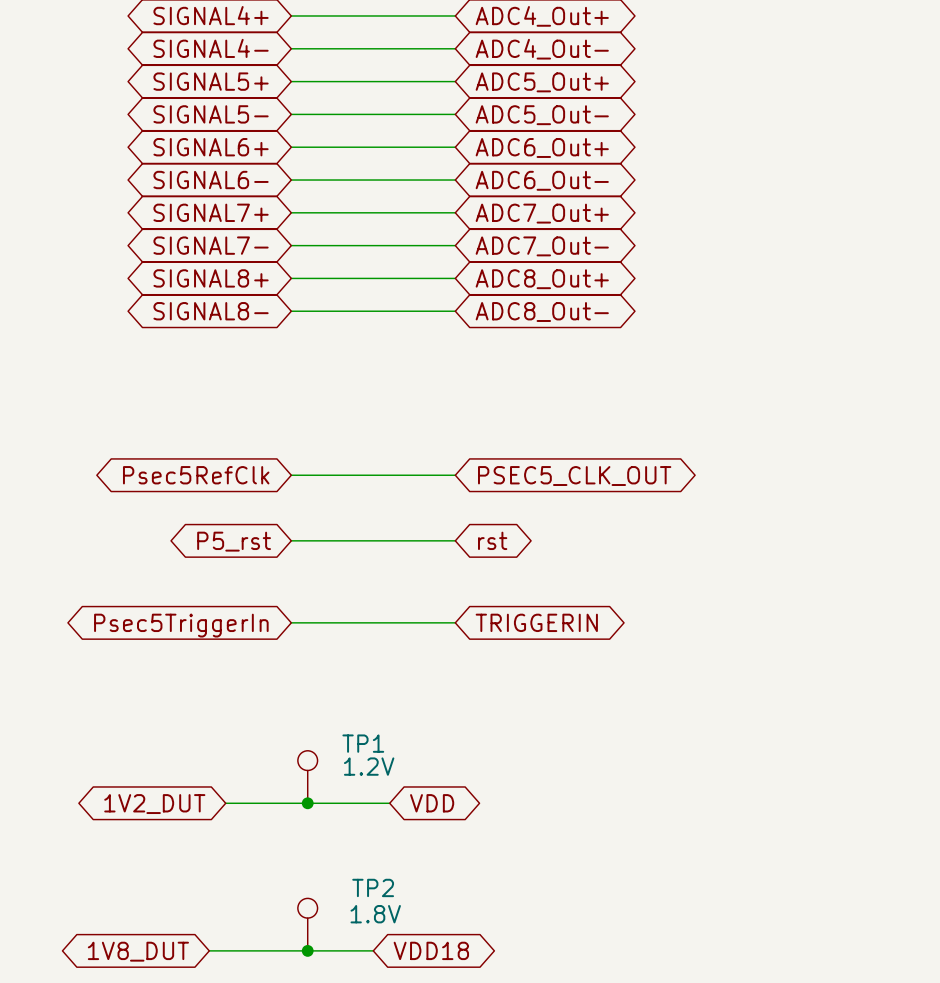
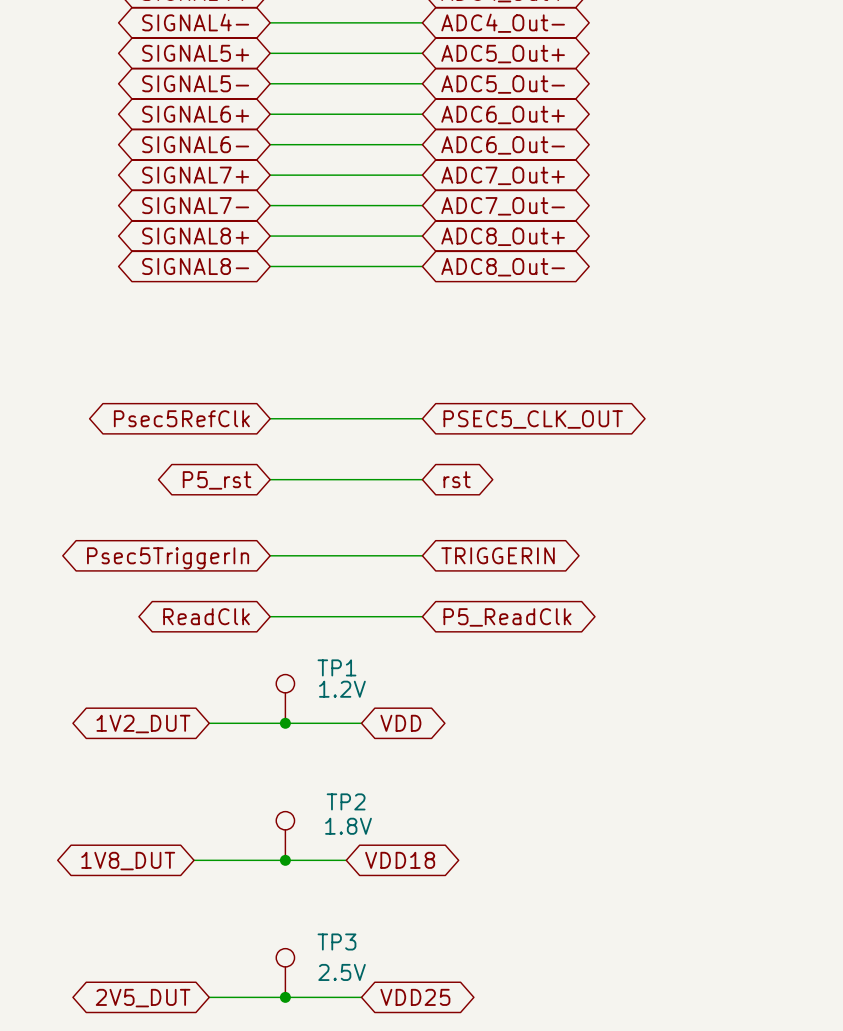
global label: none -> ReadClk (206, 616)
wire: none -> (270, 616) (422, 616)
global label: none -> P5_ReadClk (507, 617)

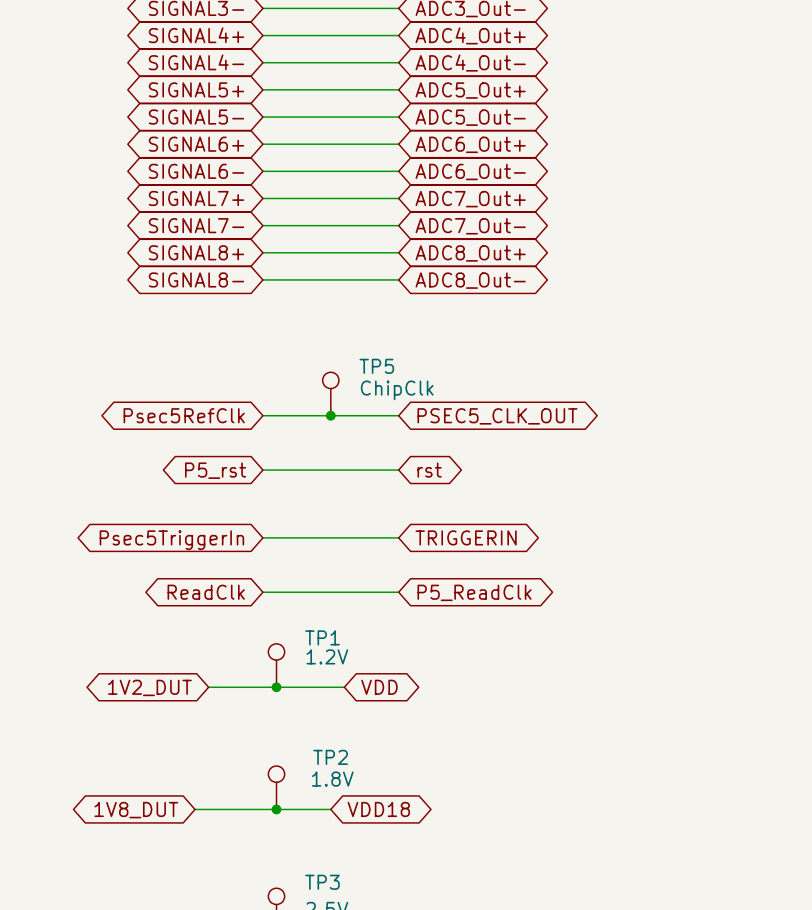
TP5: none -> ChipClk (330, 394)
junction: none -> (330, 415)

